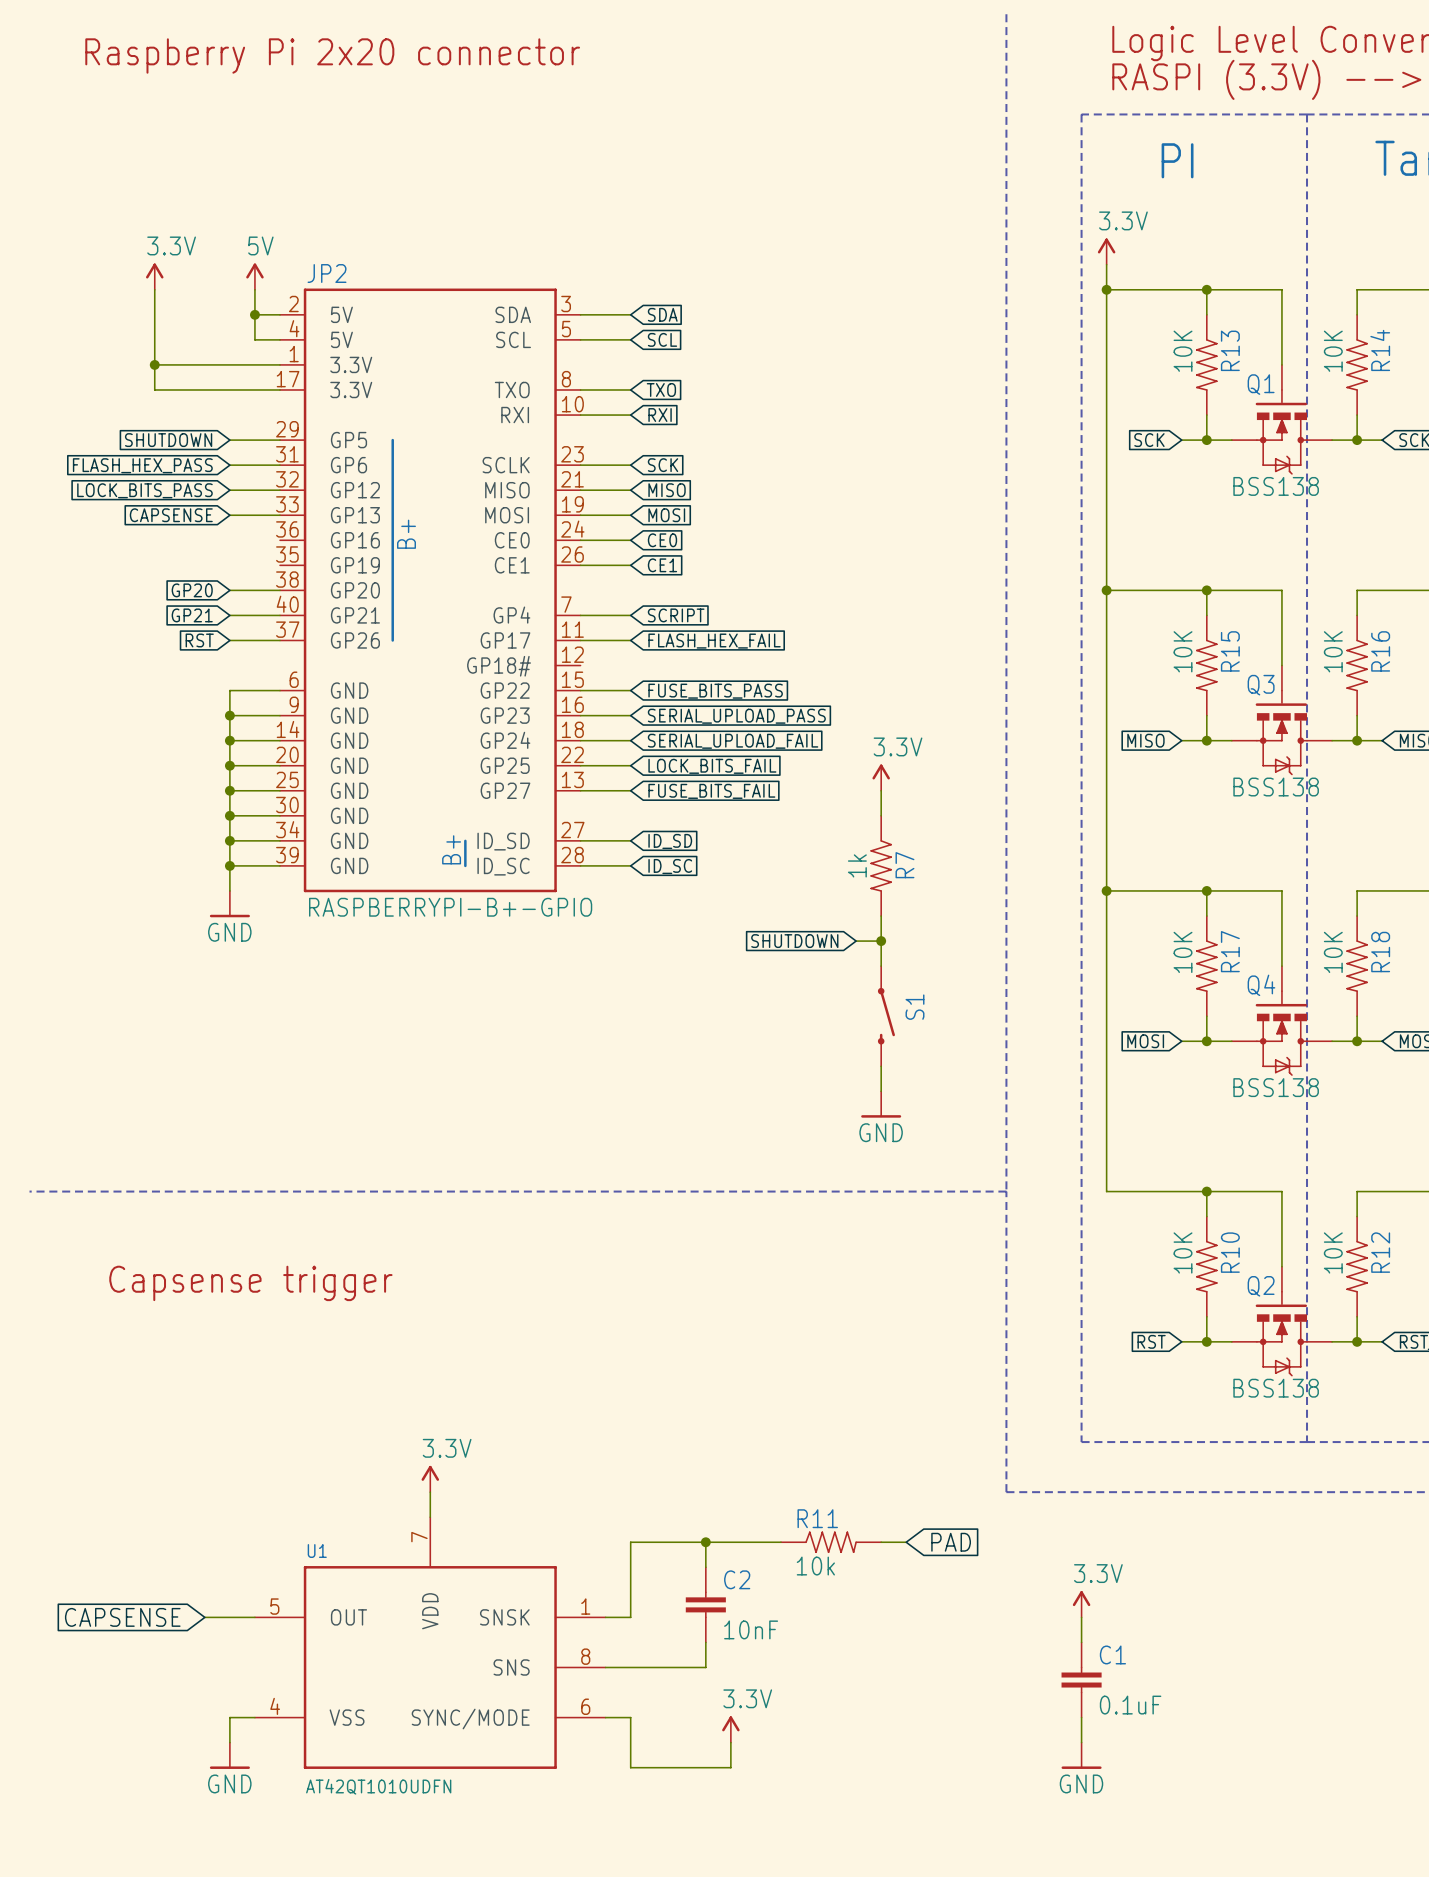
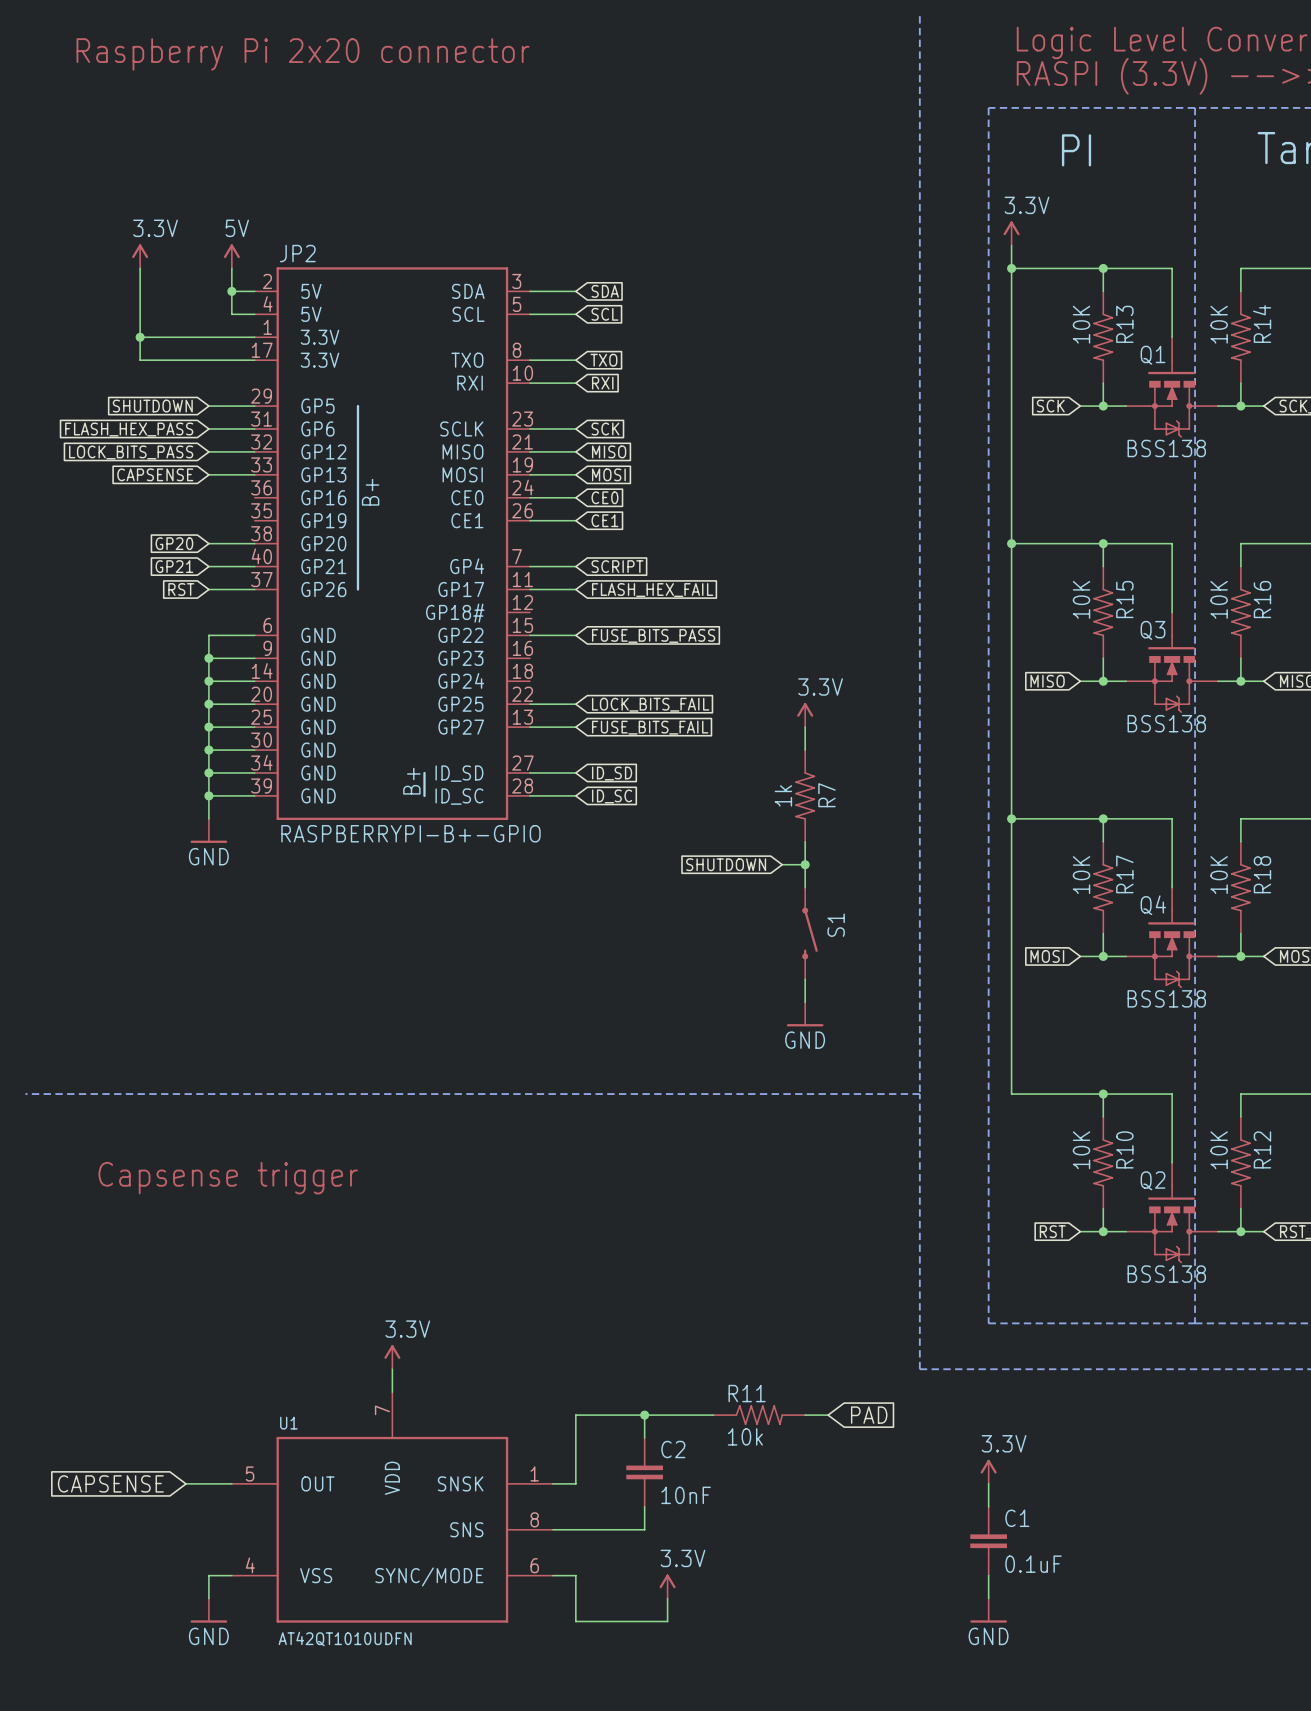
wire: (580, 715) (630, 715) -> none
global label: SERIAL_UPLOAD_PASS (736, 716) -> none
wire: (580, 740) (630, 740) -> none
global label: SERIAL_UPLOAD_FAIL (733, 741) -> none

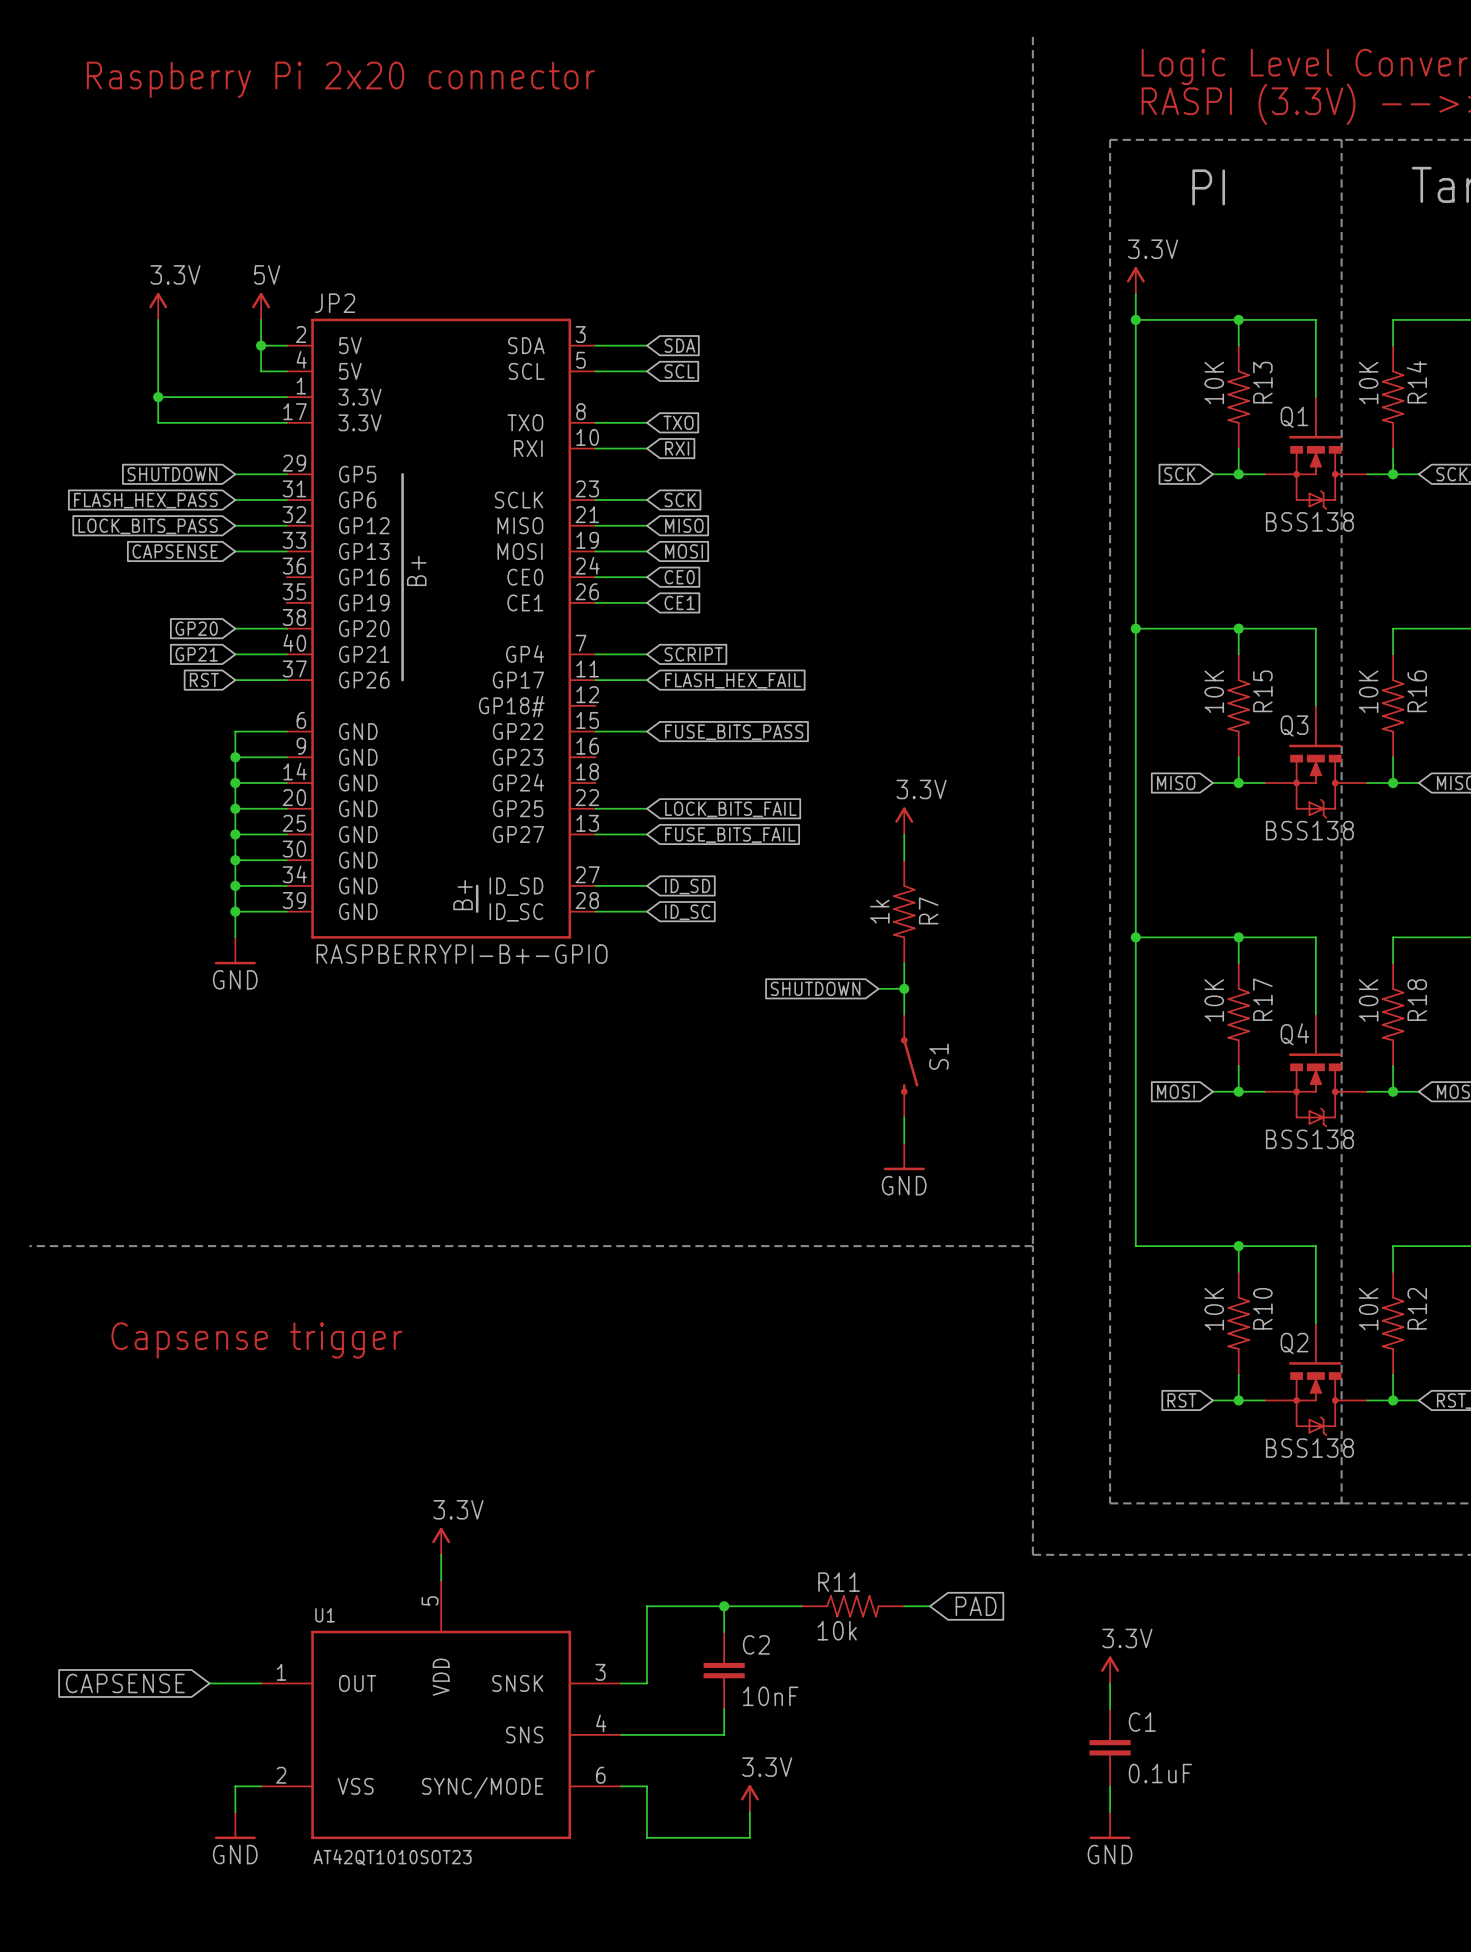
U1 pin number: 7 (382, 1410) -> 5 (430, 1600)
U1 pin number: 5 (250, 1473) -> 1 (281, 1672)
U1 pin number: 1 (534, 1473) -> 3 (600, 1672)
U1 pin number: 8 (534, 1519) -> 4 (601, 1723)
U1 pin number: 4 (250, 1565) -> 2 (281, 1775)
U1 value: AT42QT1010UDFN (345, 1638) -> AT42QT1010SOT23 (392, 1857)

